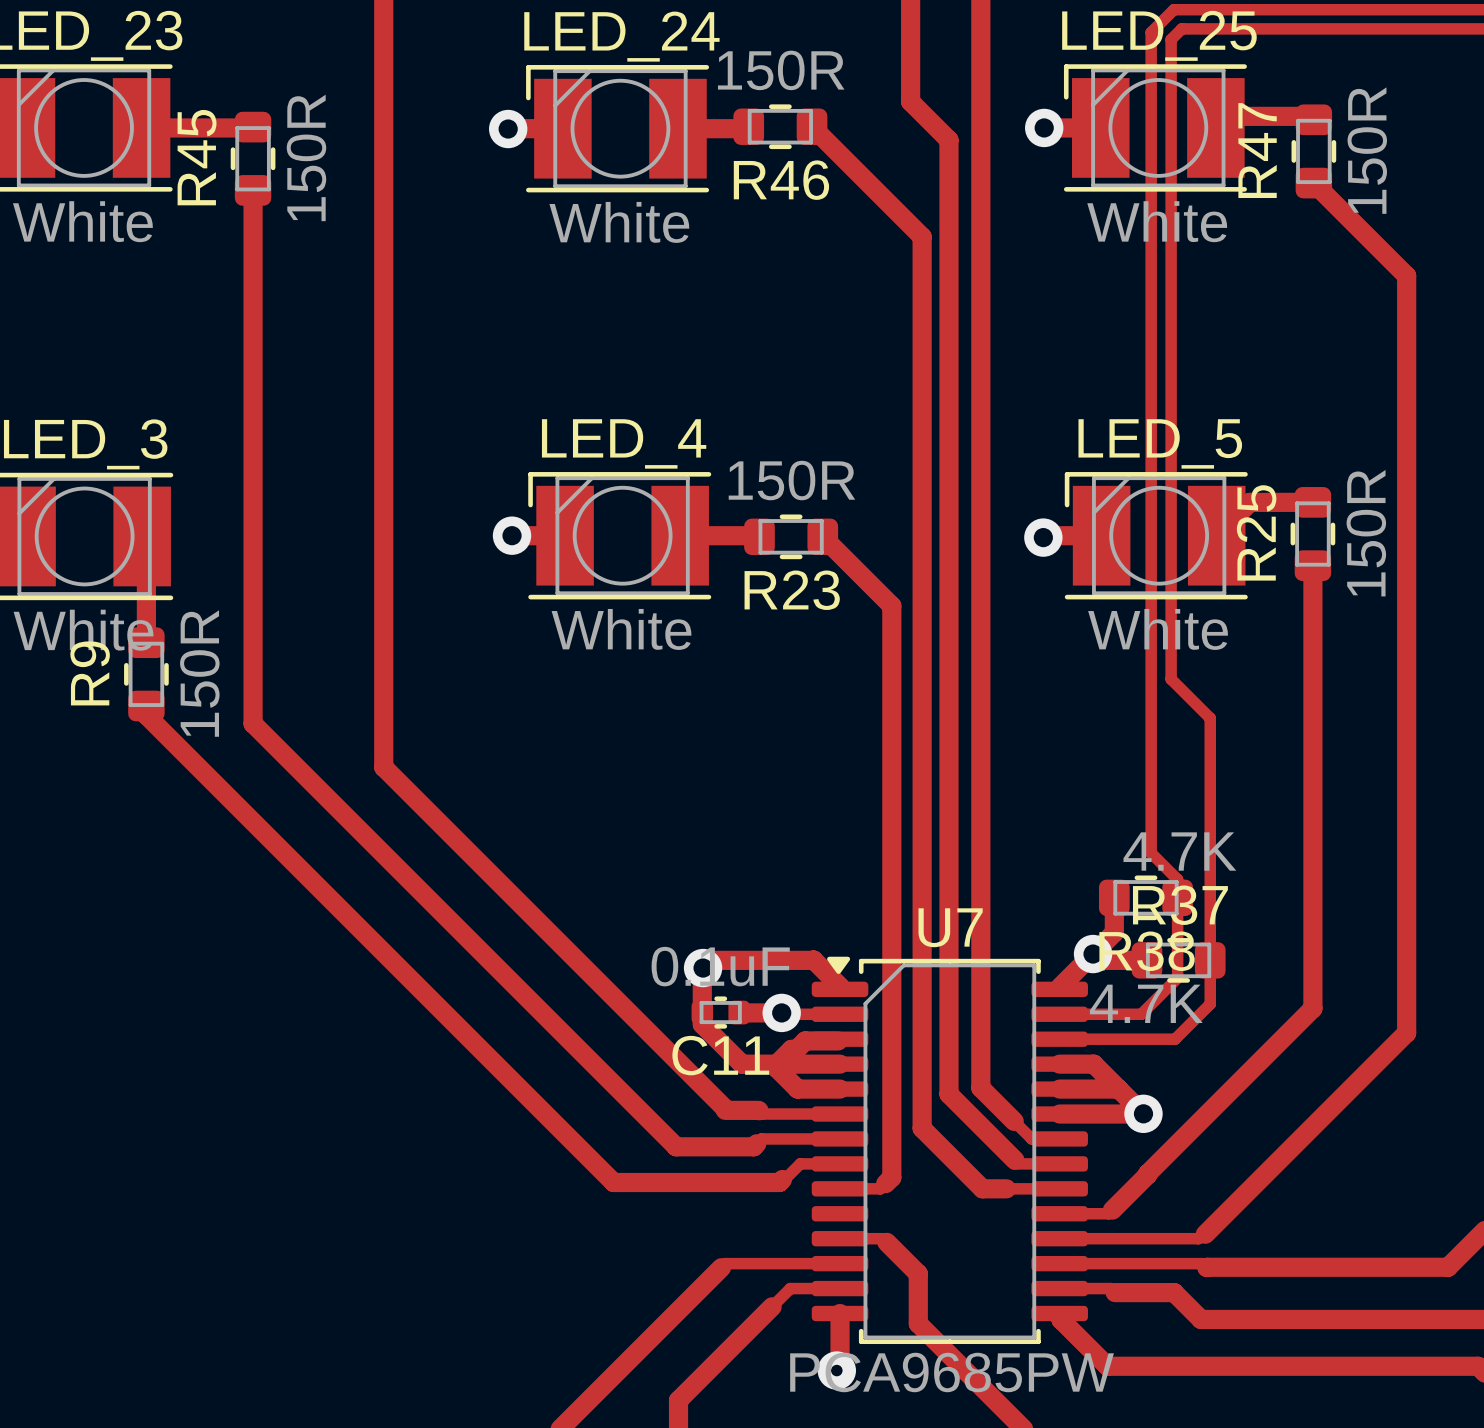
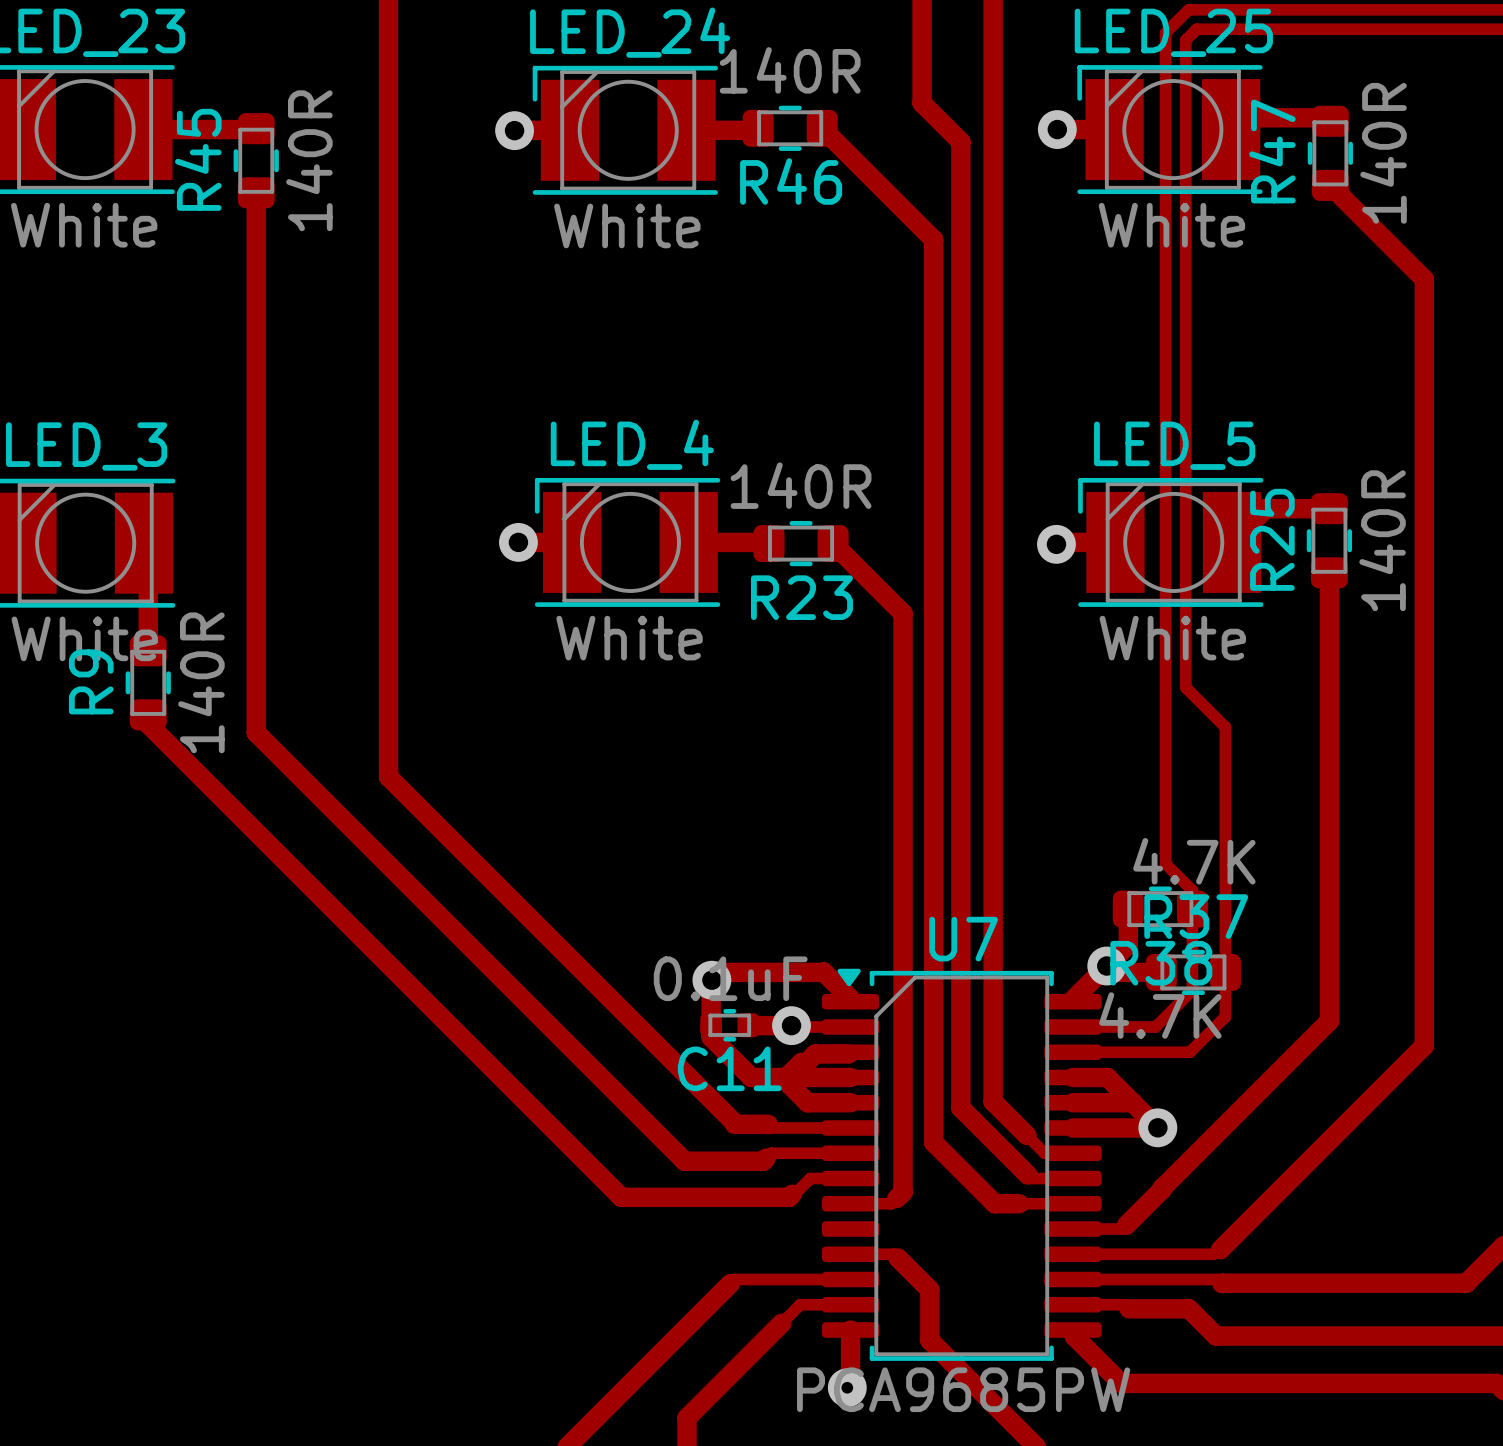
R46 value: 150R (781, 70) -> 140R (790, 70)
R47 value: 150R (1367, 150) -> 140R (1383, 153)
R45 value: 150R (306, 157) -> 140R (309, 160)
R23 value: 150R (791, 480) -> 140R (801, 485)
R25 value: 150R (1366, 533) -> 140R (1382, 540)
R9 value: 150R (199, 673) -> 140R (201, 682)

